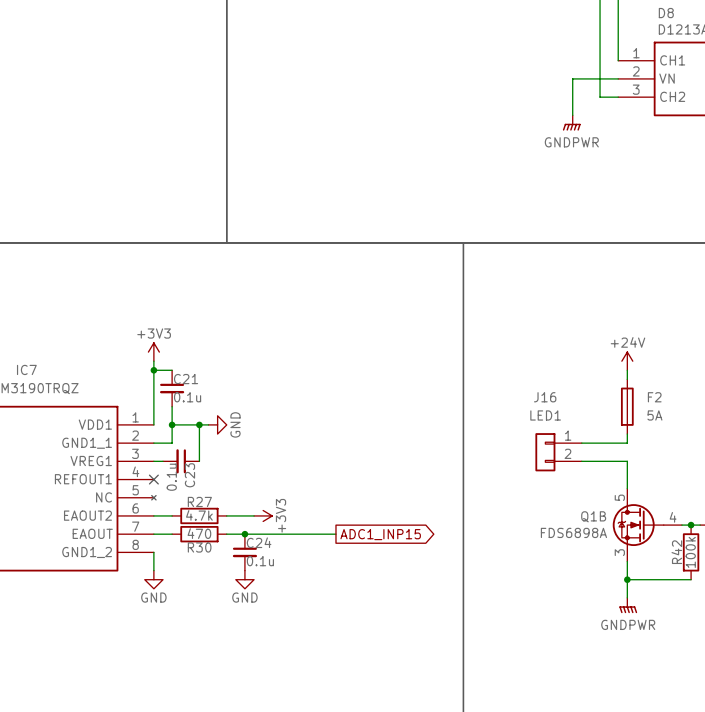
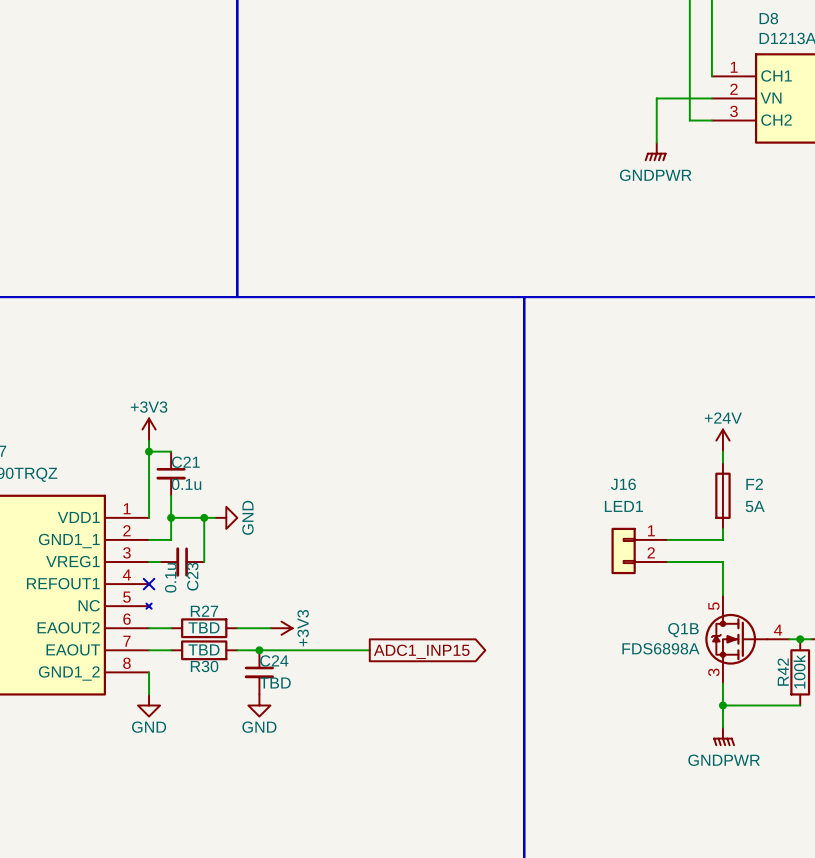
R27 value: 4.7k (199, 515) -> TBD (204, 627)
R30 value: 470 (199, 533) -> TBD (204, 649)
C24 value: 0.1u (260, 561) -> TBD (275, 683)

